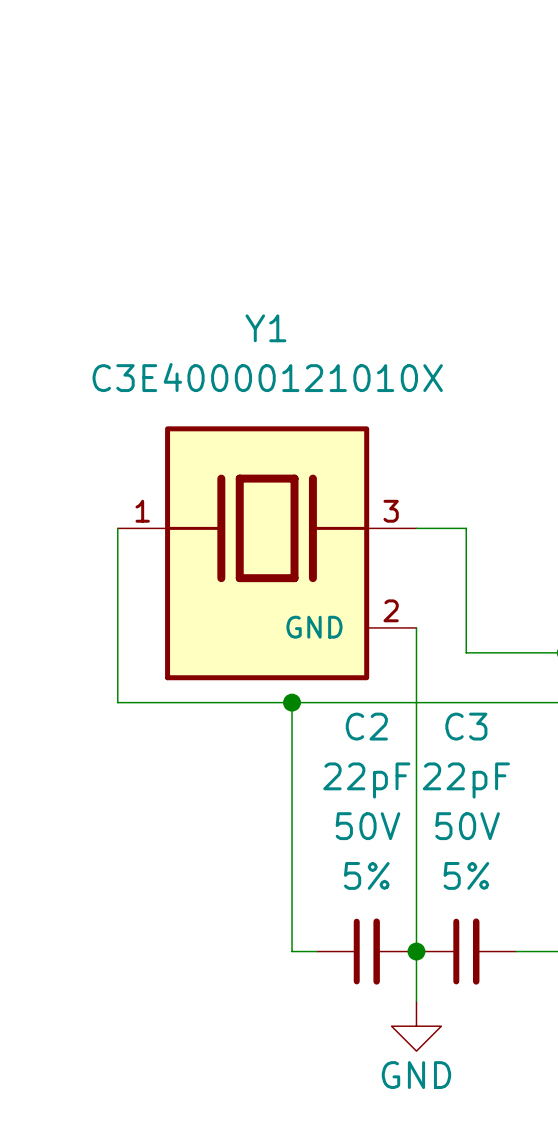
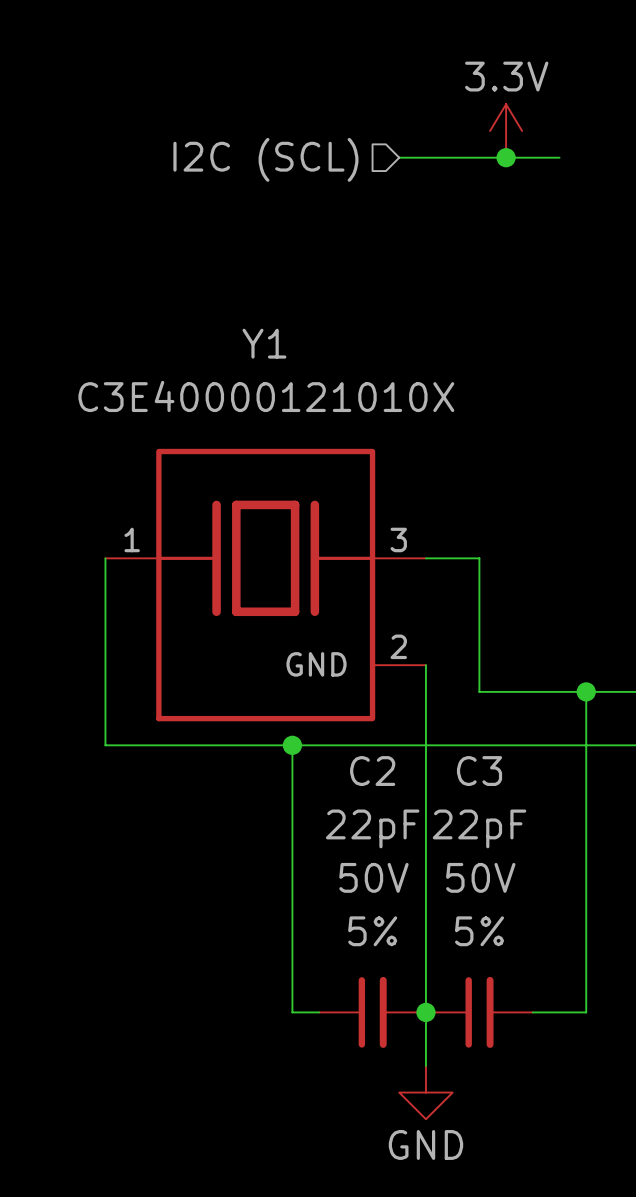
power symbol: none -> 3.3V (506, 130)
wire: none -> (399, 157) (559, 157)
junction: none -> (506, 157)
hierarchical label: none -> I2C (SCL) (265, 159)

